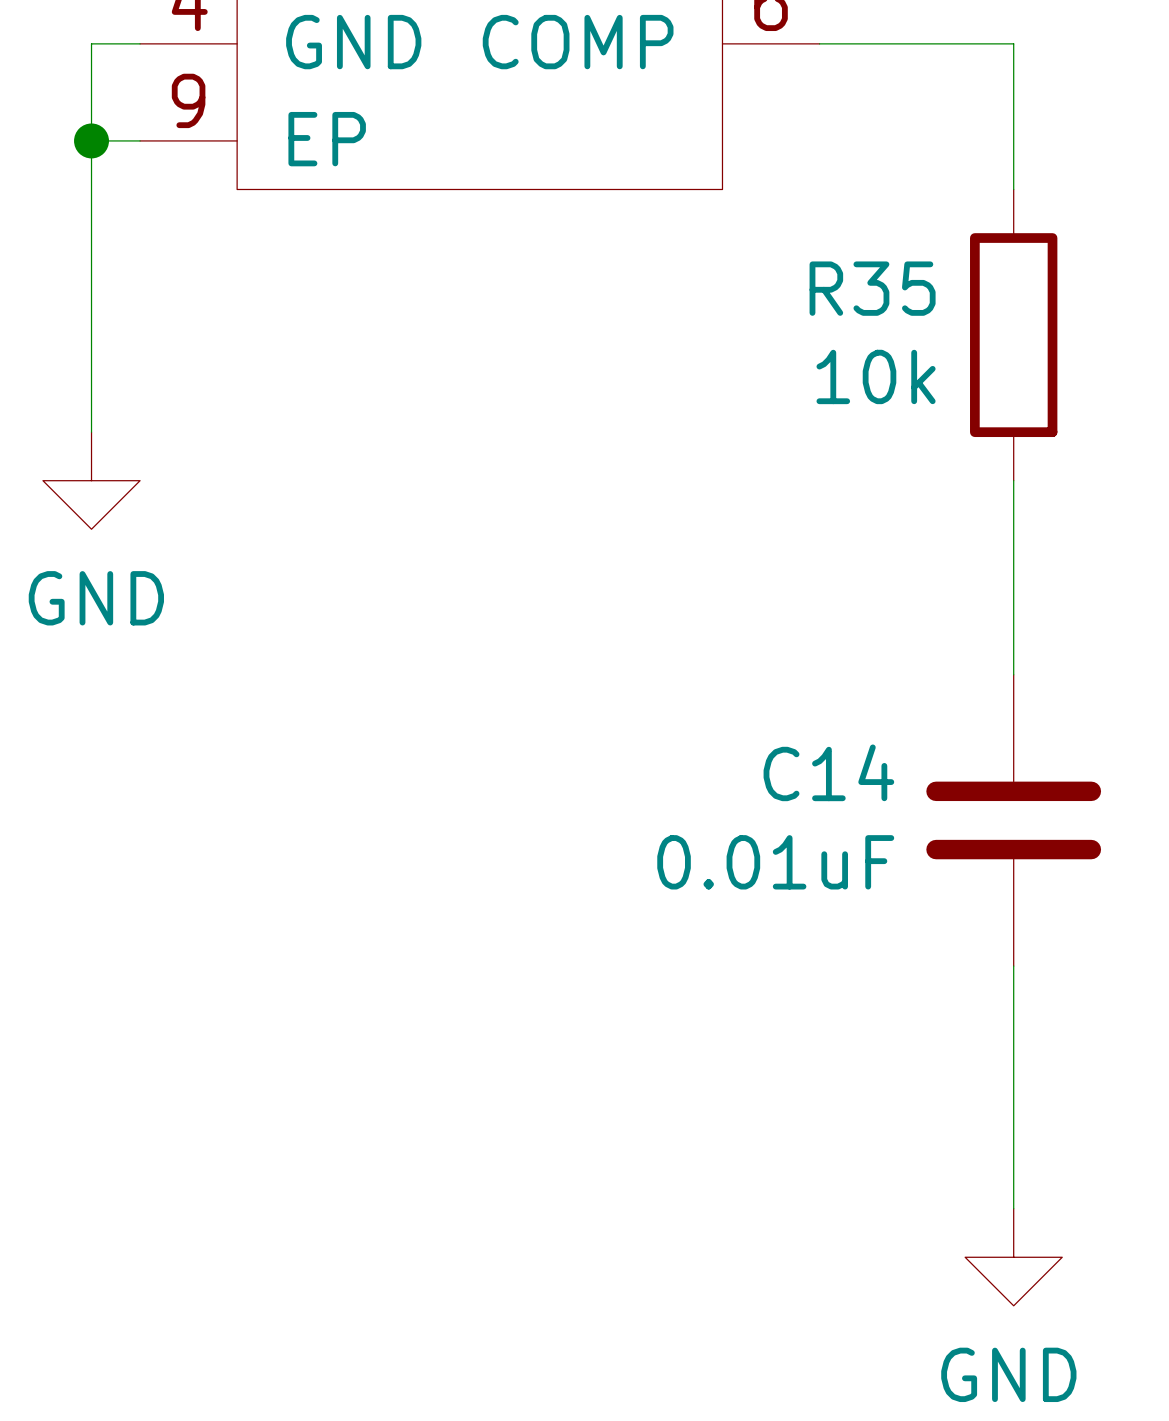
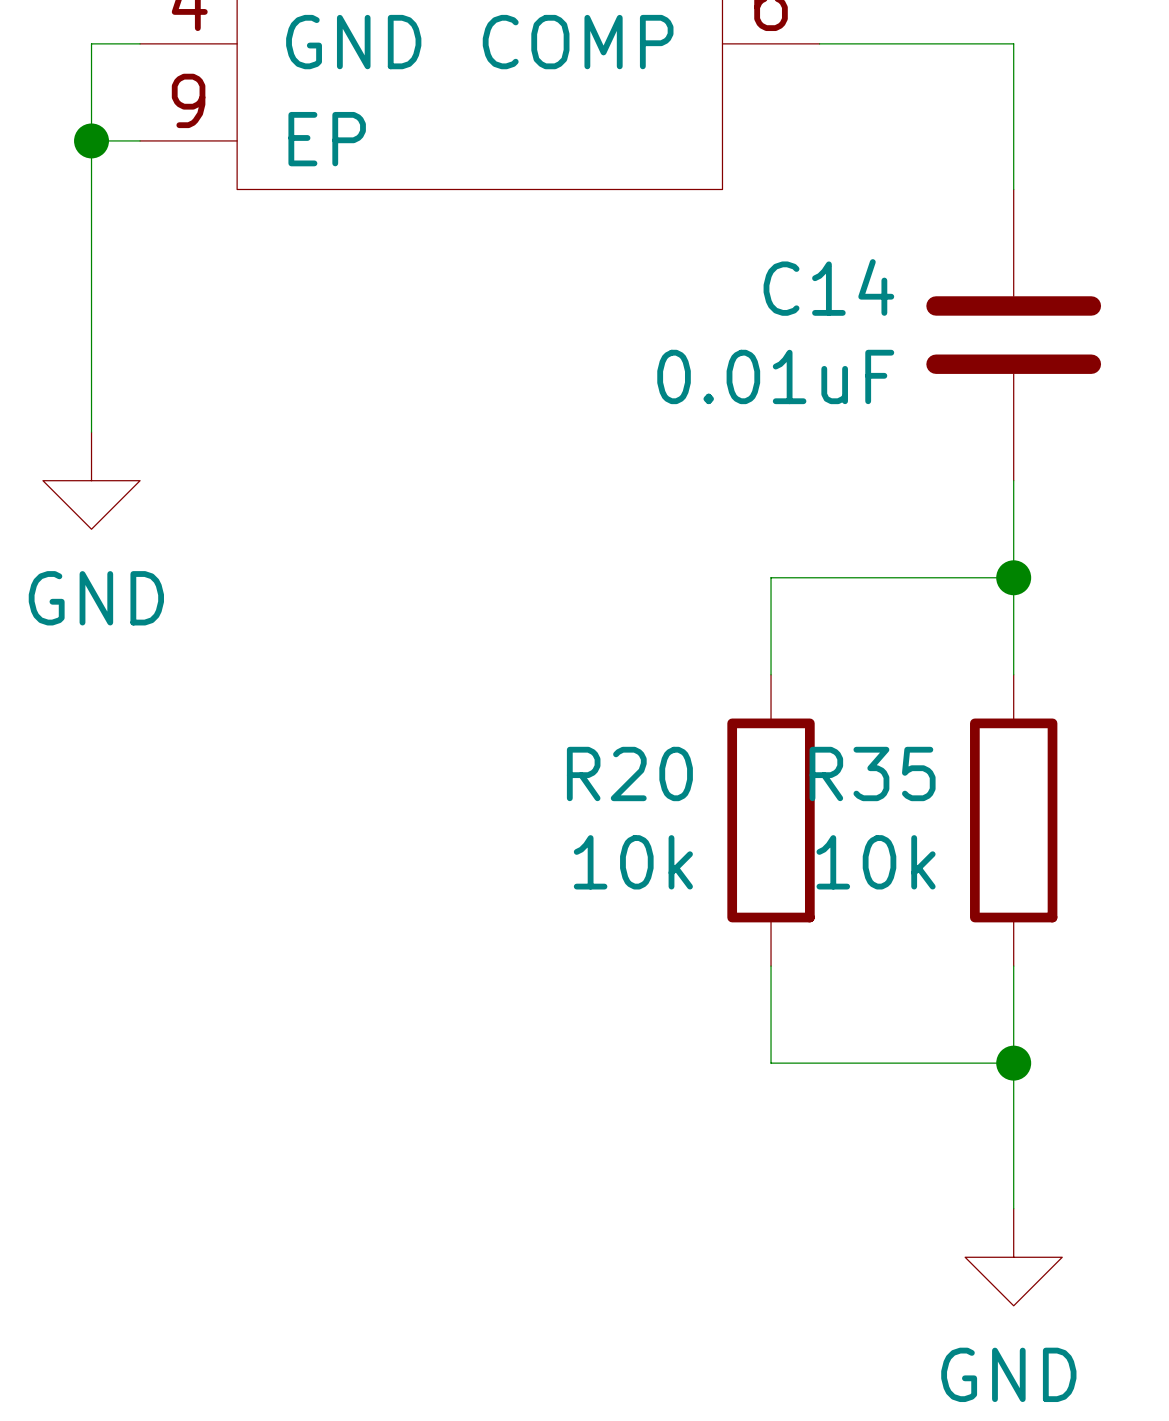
R35 position: (1013, 335) -> (1013, 820)
wire: none -> (1013, 577) (771, 577) (771, 674)
junction: none -> (1013, 577)
R20: none -> 10k (771, 820)
C14 position: (1013, 820) -> (1013, 335)
wire: none -> (771, 966) (771, 1063) (1013, 1063)
junction: none -> (1013, 1063)

